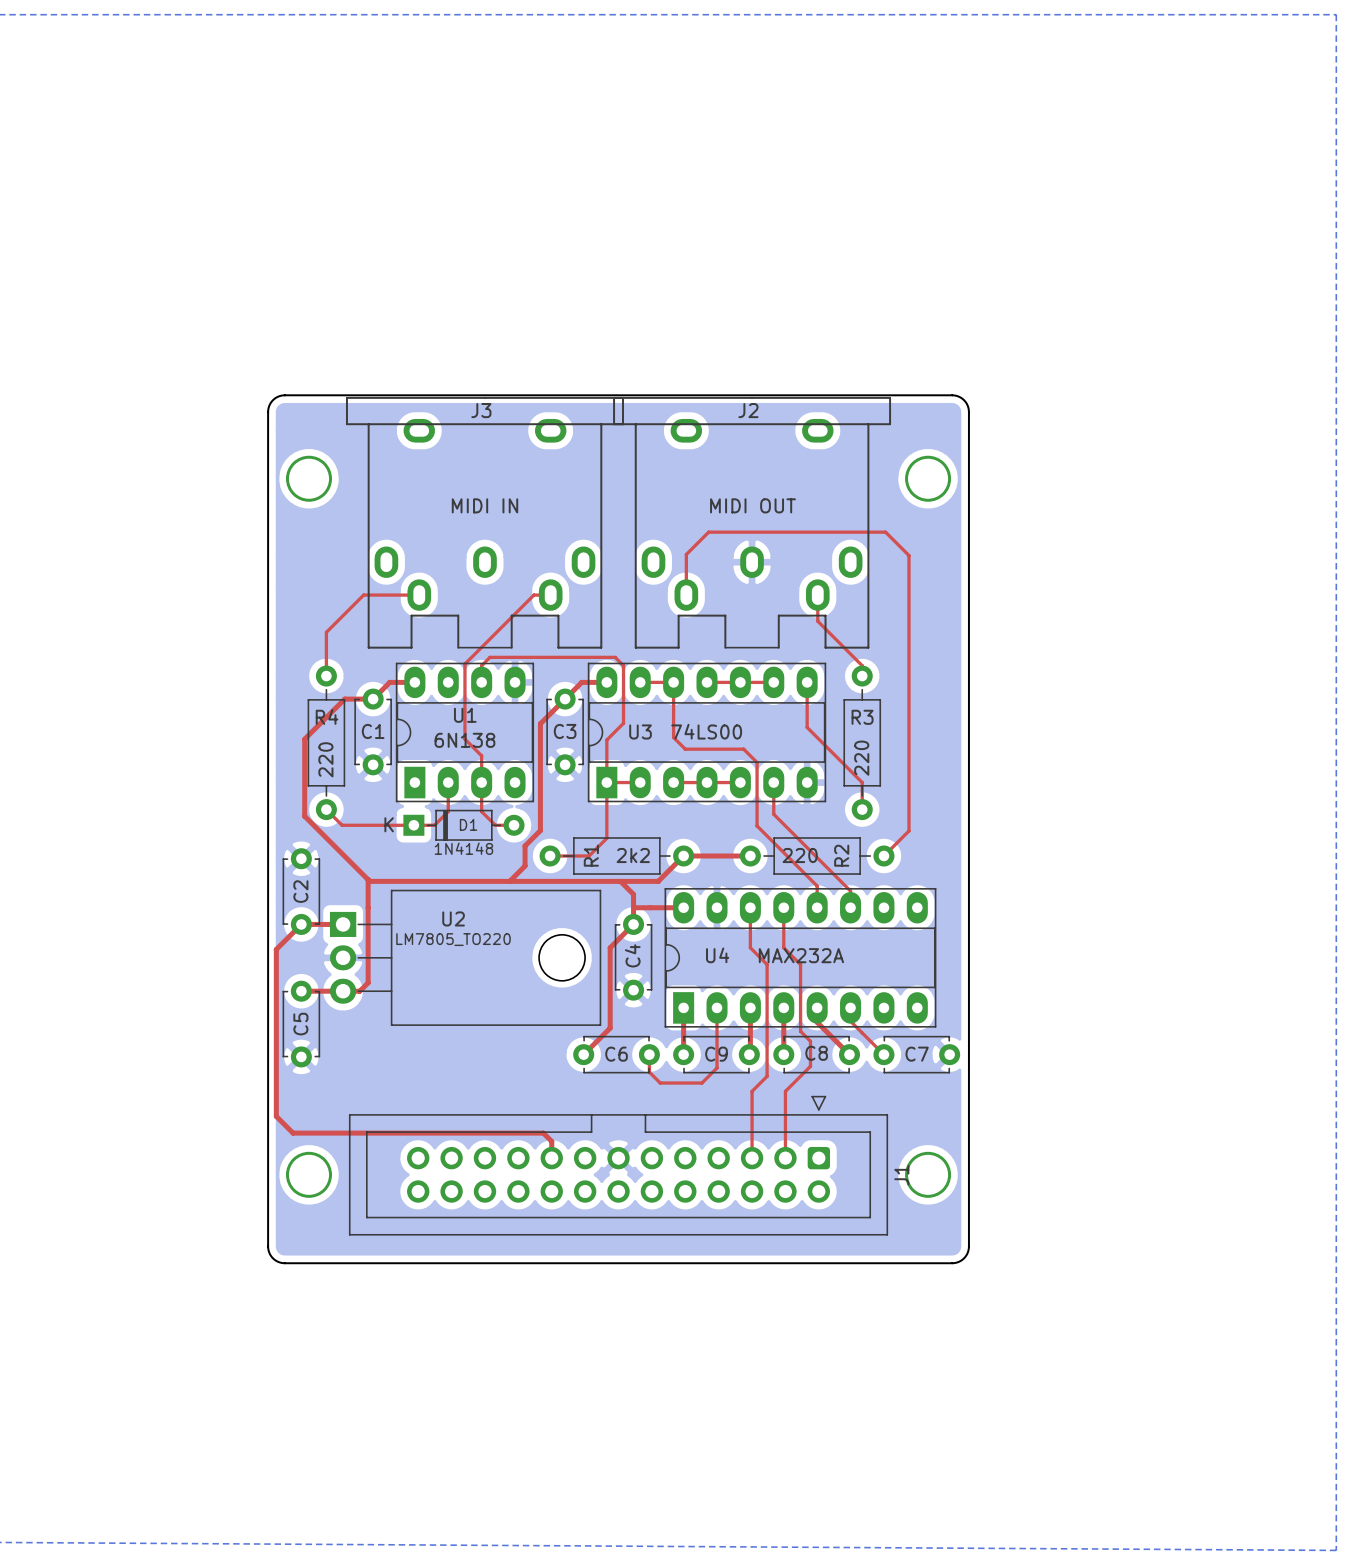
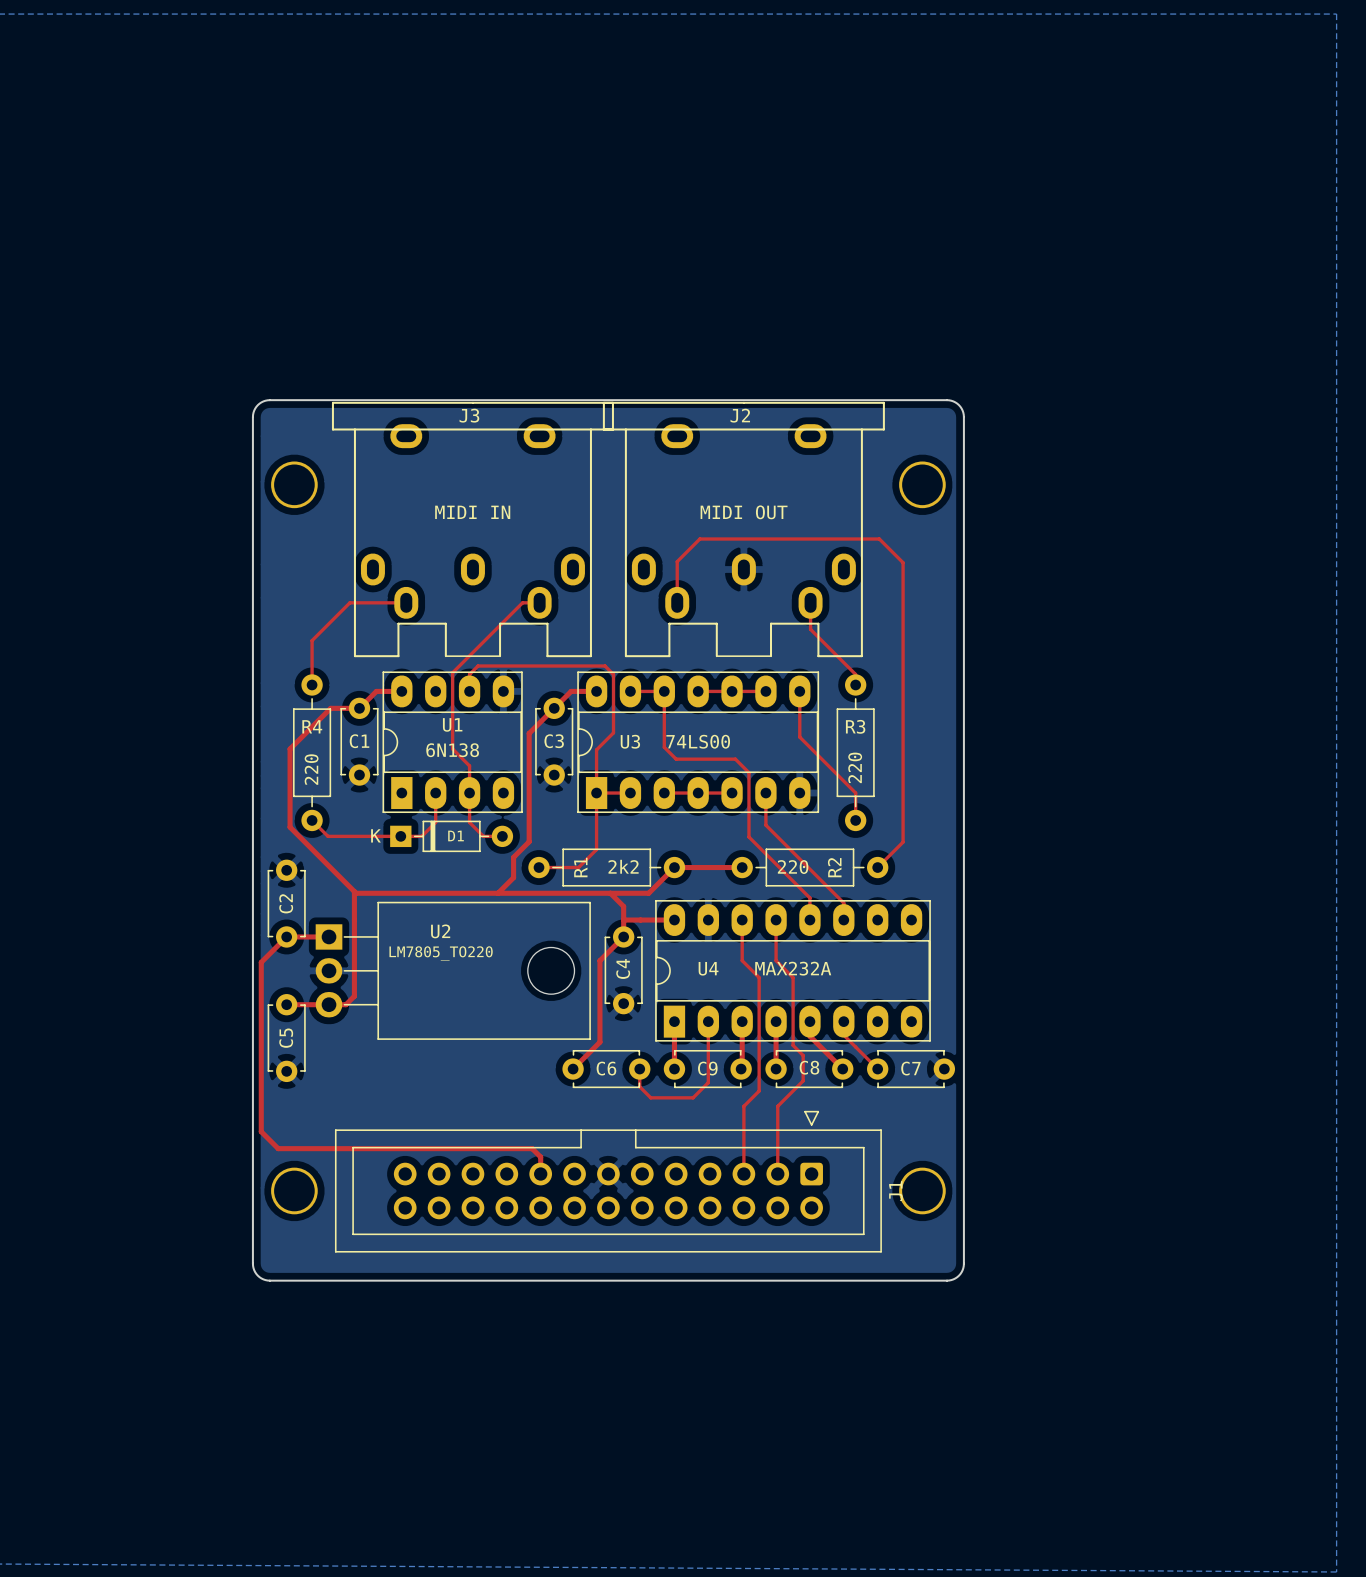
D1 value: 1N4148 (463, 848) -> none

